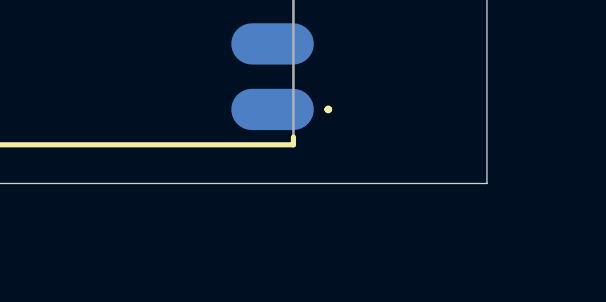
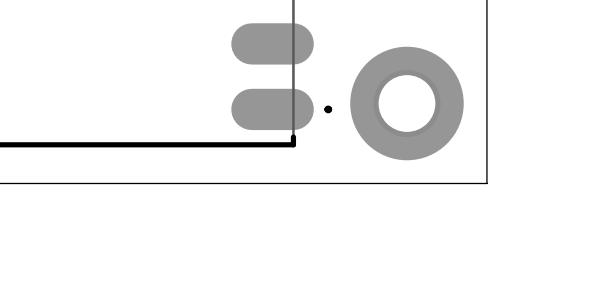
part: none -> (406, 103)

